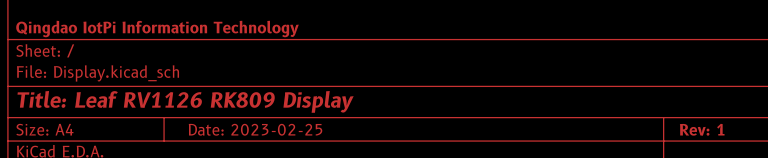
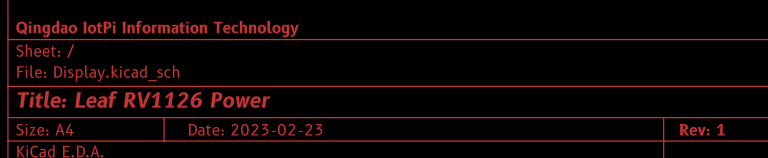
title block: Title: Leaf RV1126 RK809 Display (185, 101) -> Title: Leaf RV1126 Power (143, 99)
title block: Date: 2023-02-25 (255, 129) -> Date: 2023-02-23 (255, 129)

